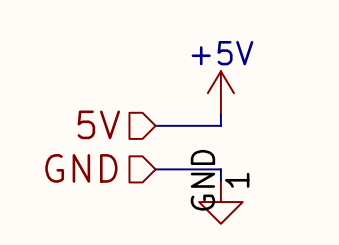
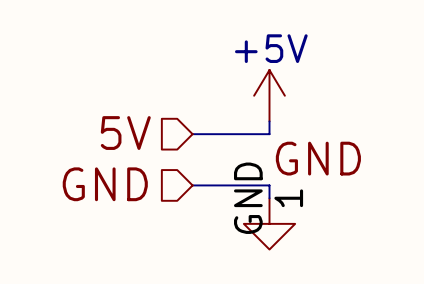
label: none -> GND (318, 158)

